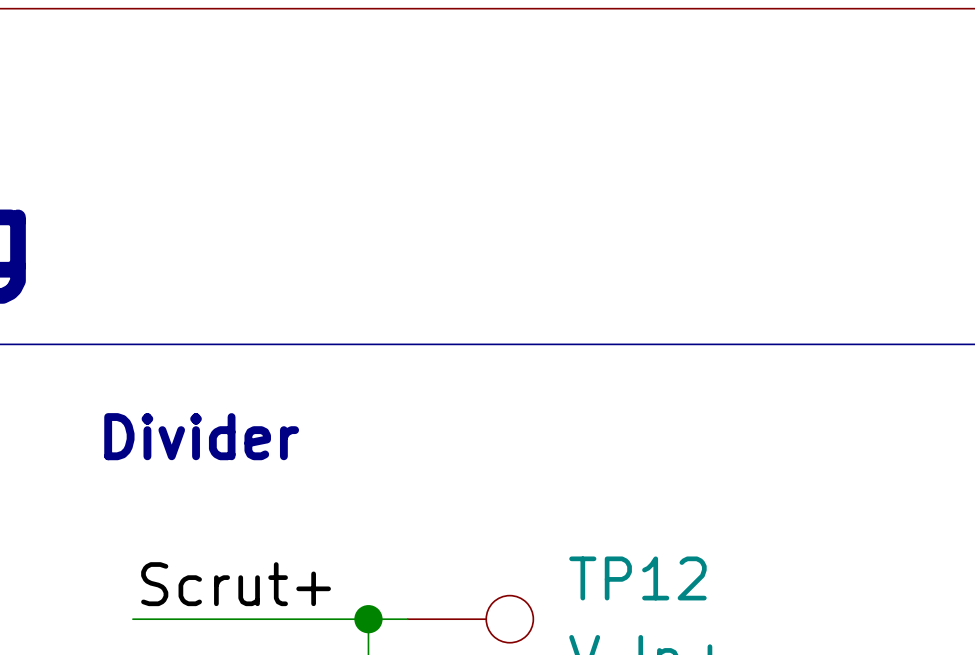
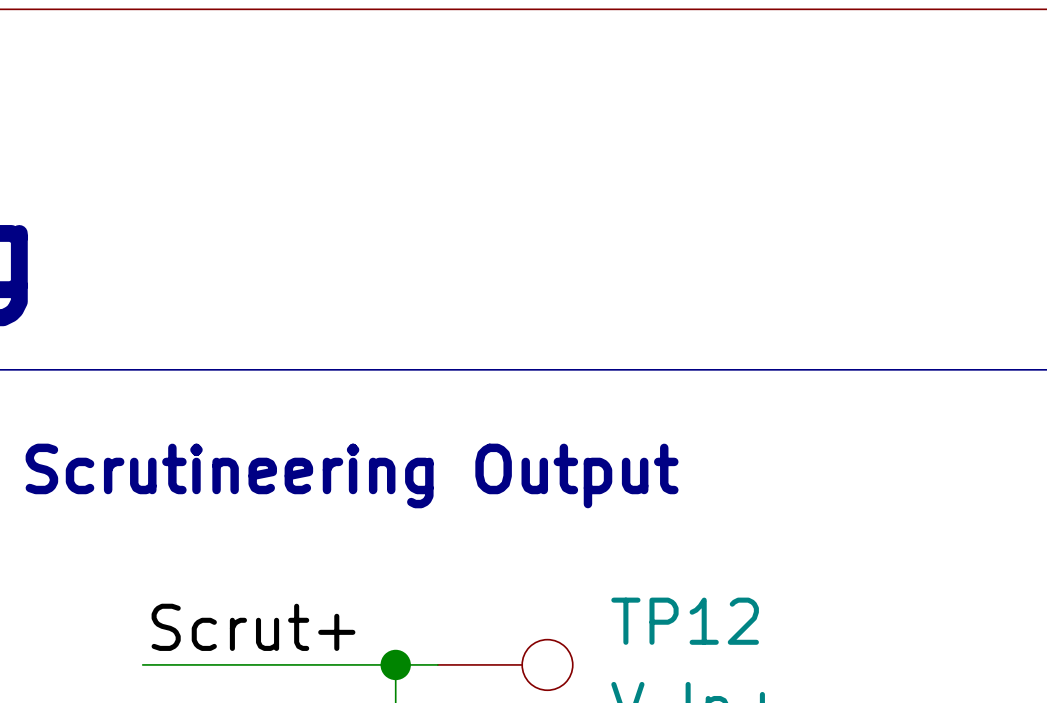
text: Divider (201, 436) -> none
text: none -> Scrutineering Output (352, 475)

